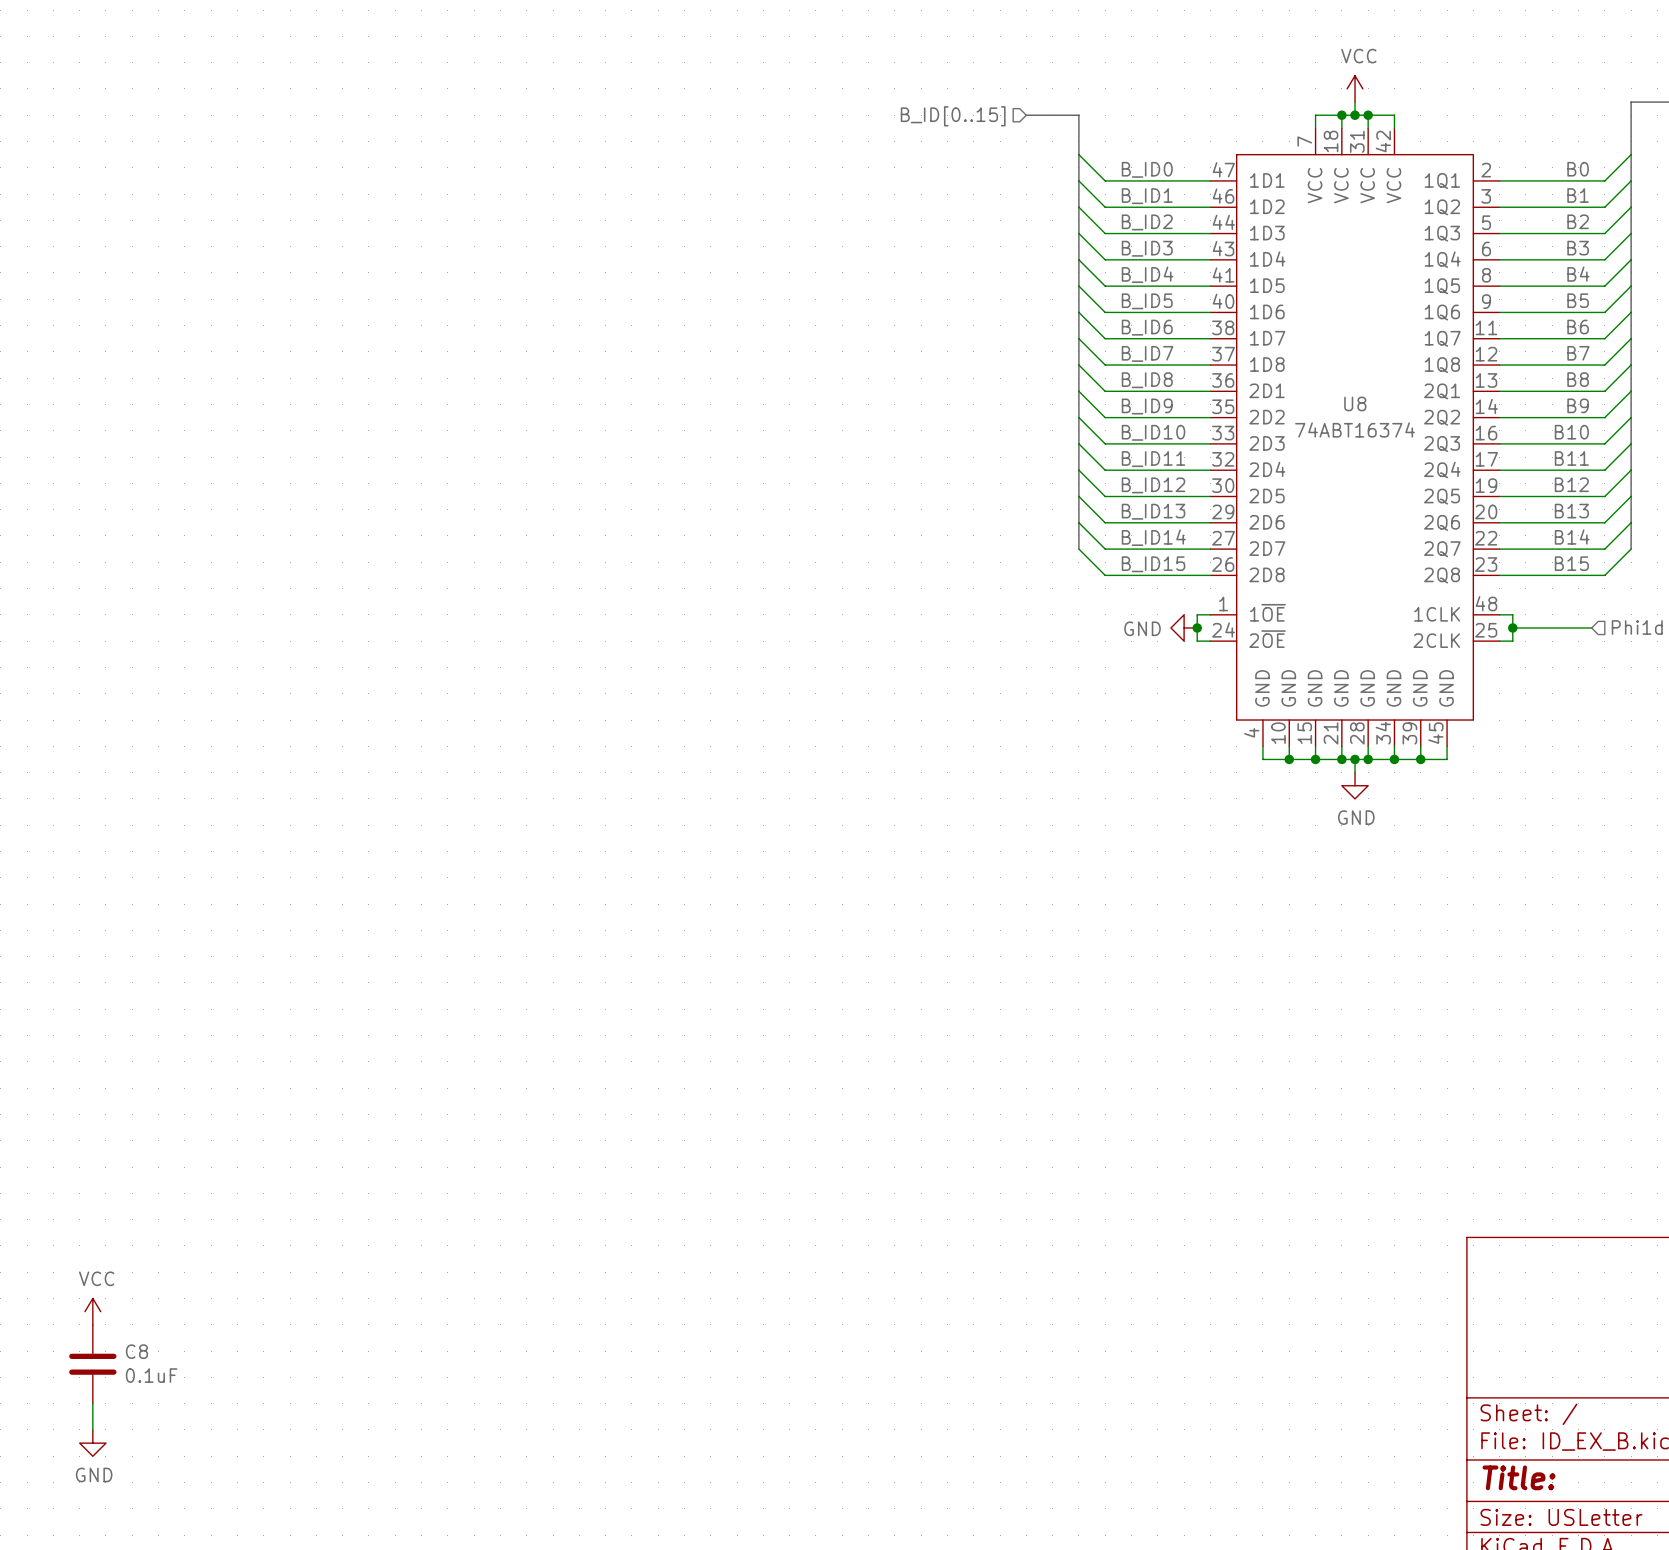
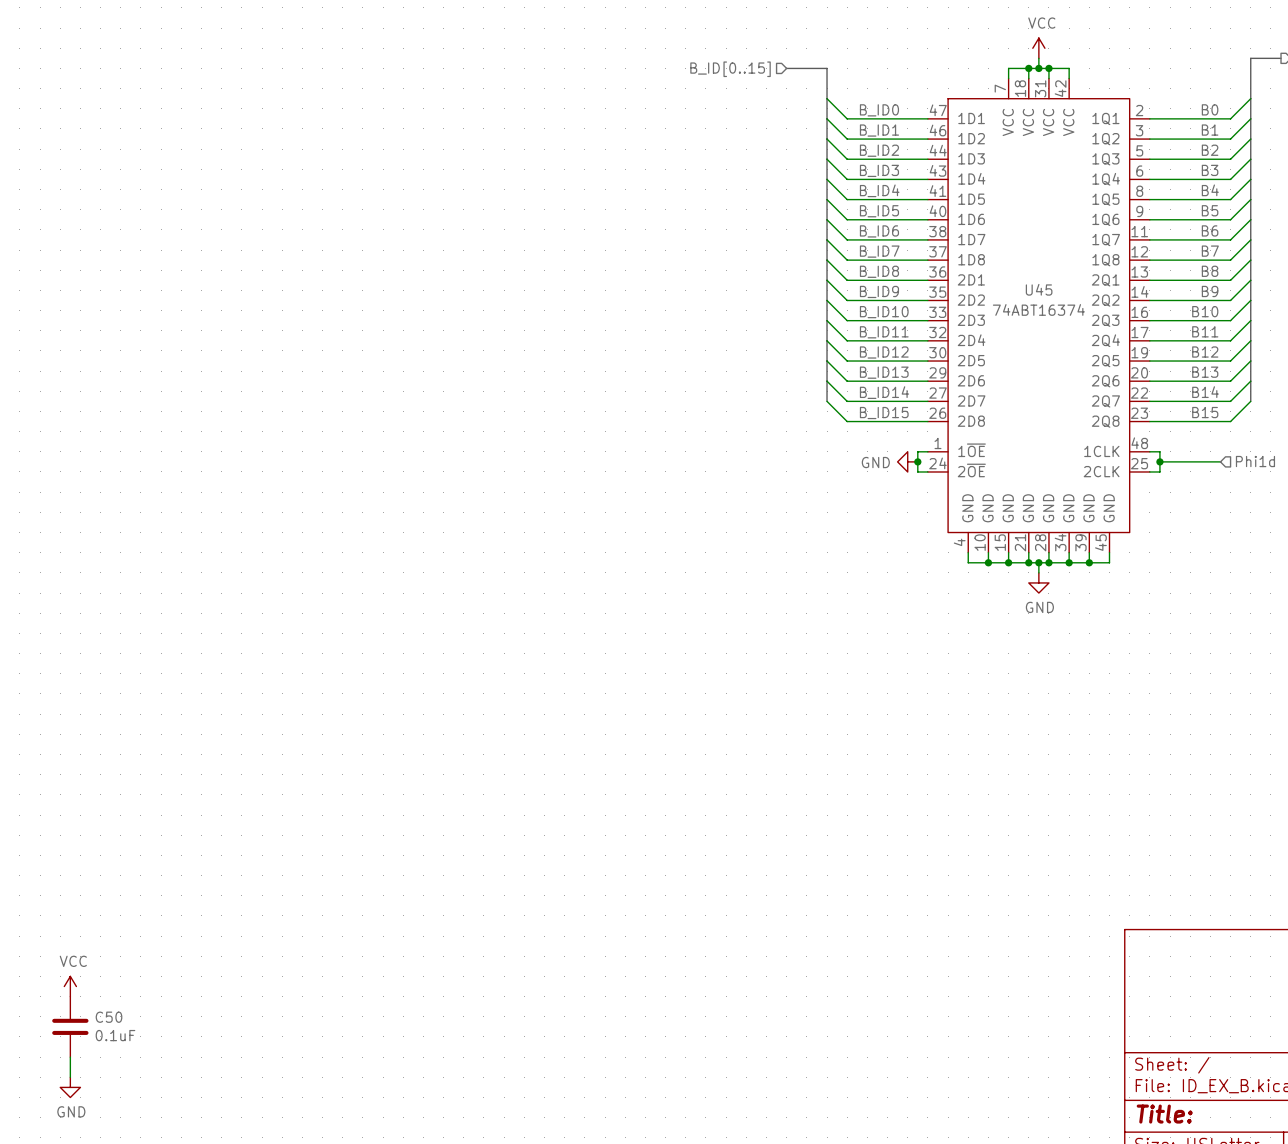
U8 name: U8 (1355, 403) -> U45 (1039, 289)
C8 name: C8 (136, 1351) -> C50 (109, 1017)

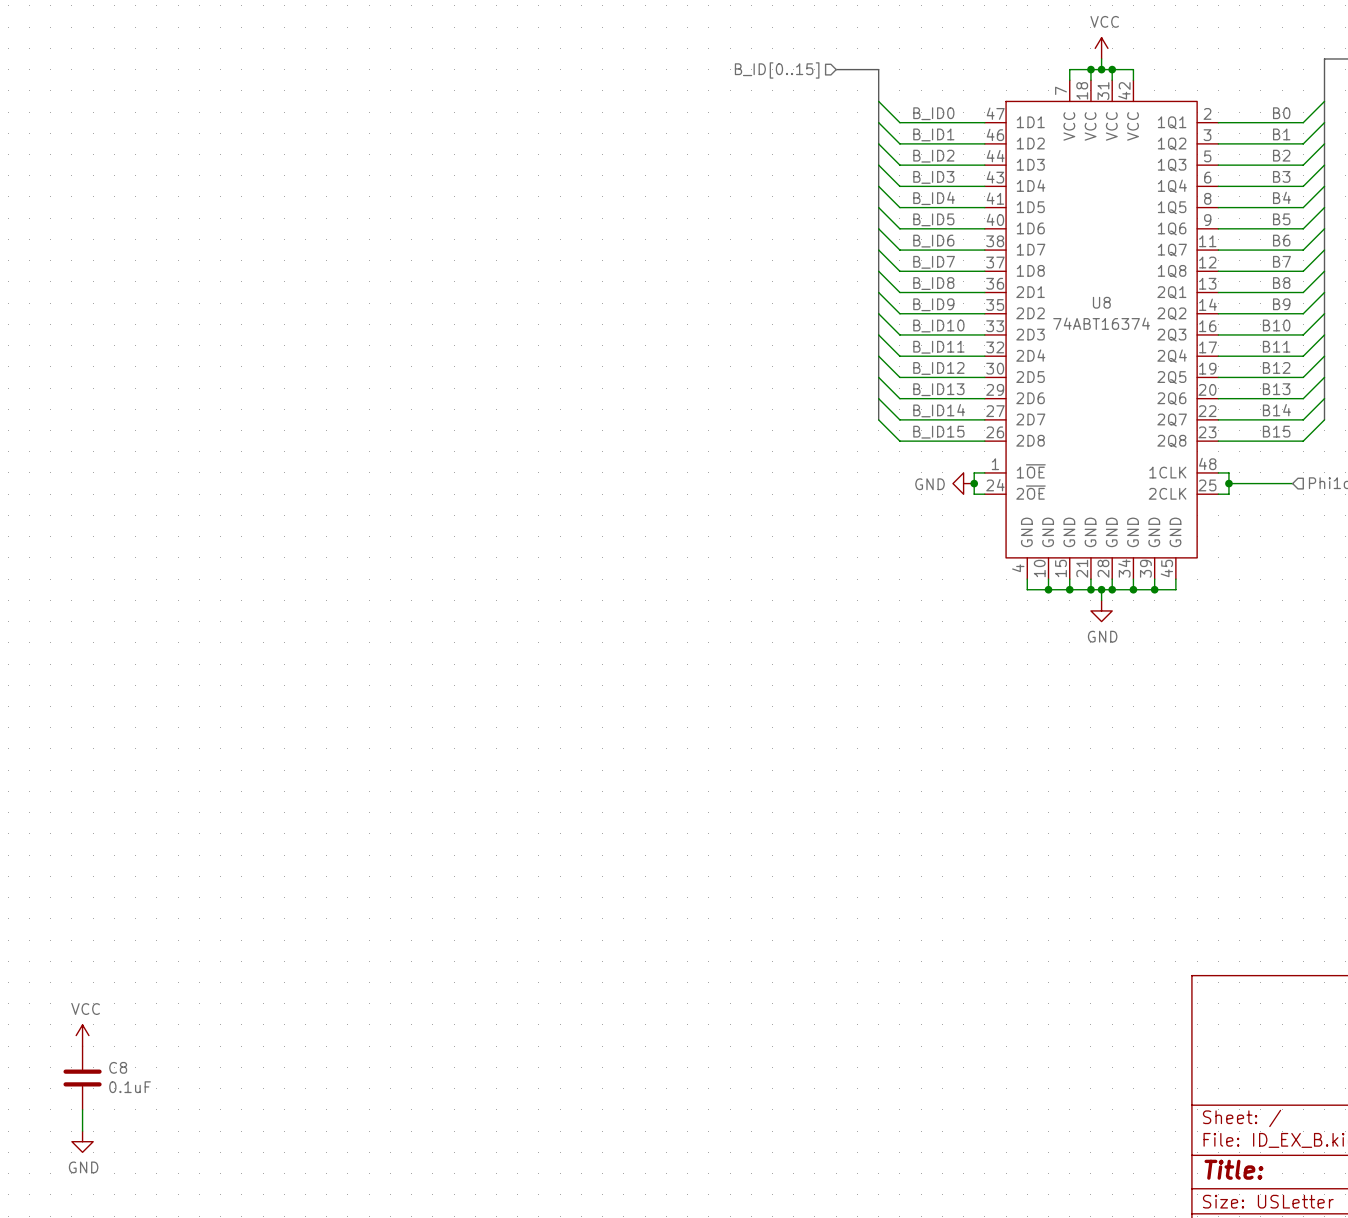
U45 name: U45 (1039, 289) -> U8 (1101, 302)
C50 name: C50 (109, 1017) -> C8 (118, 1067)

